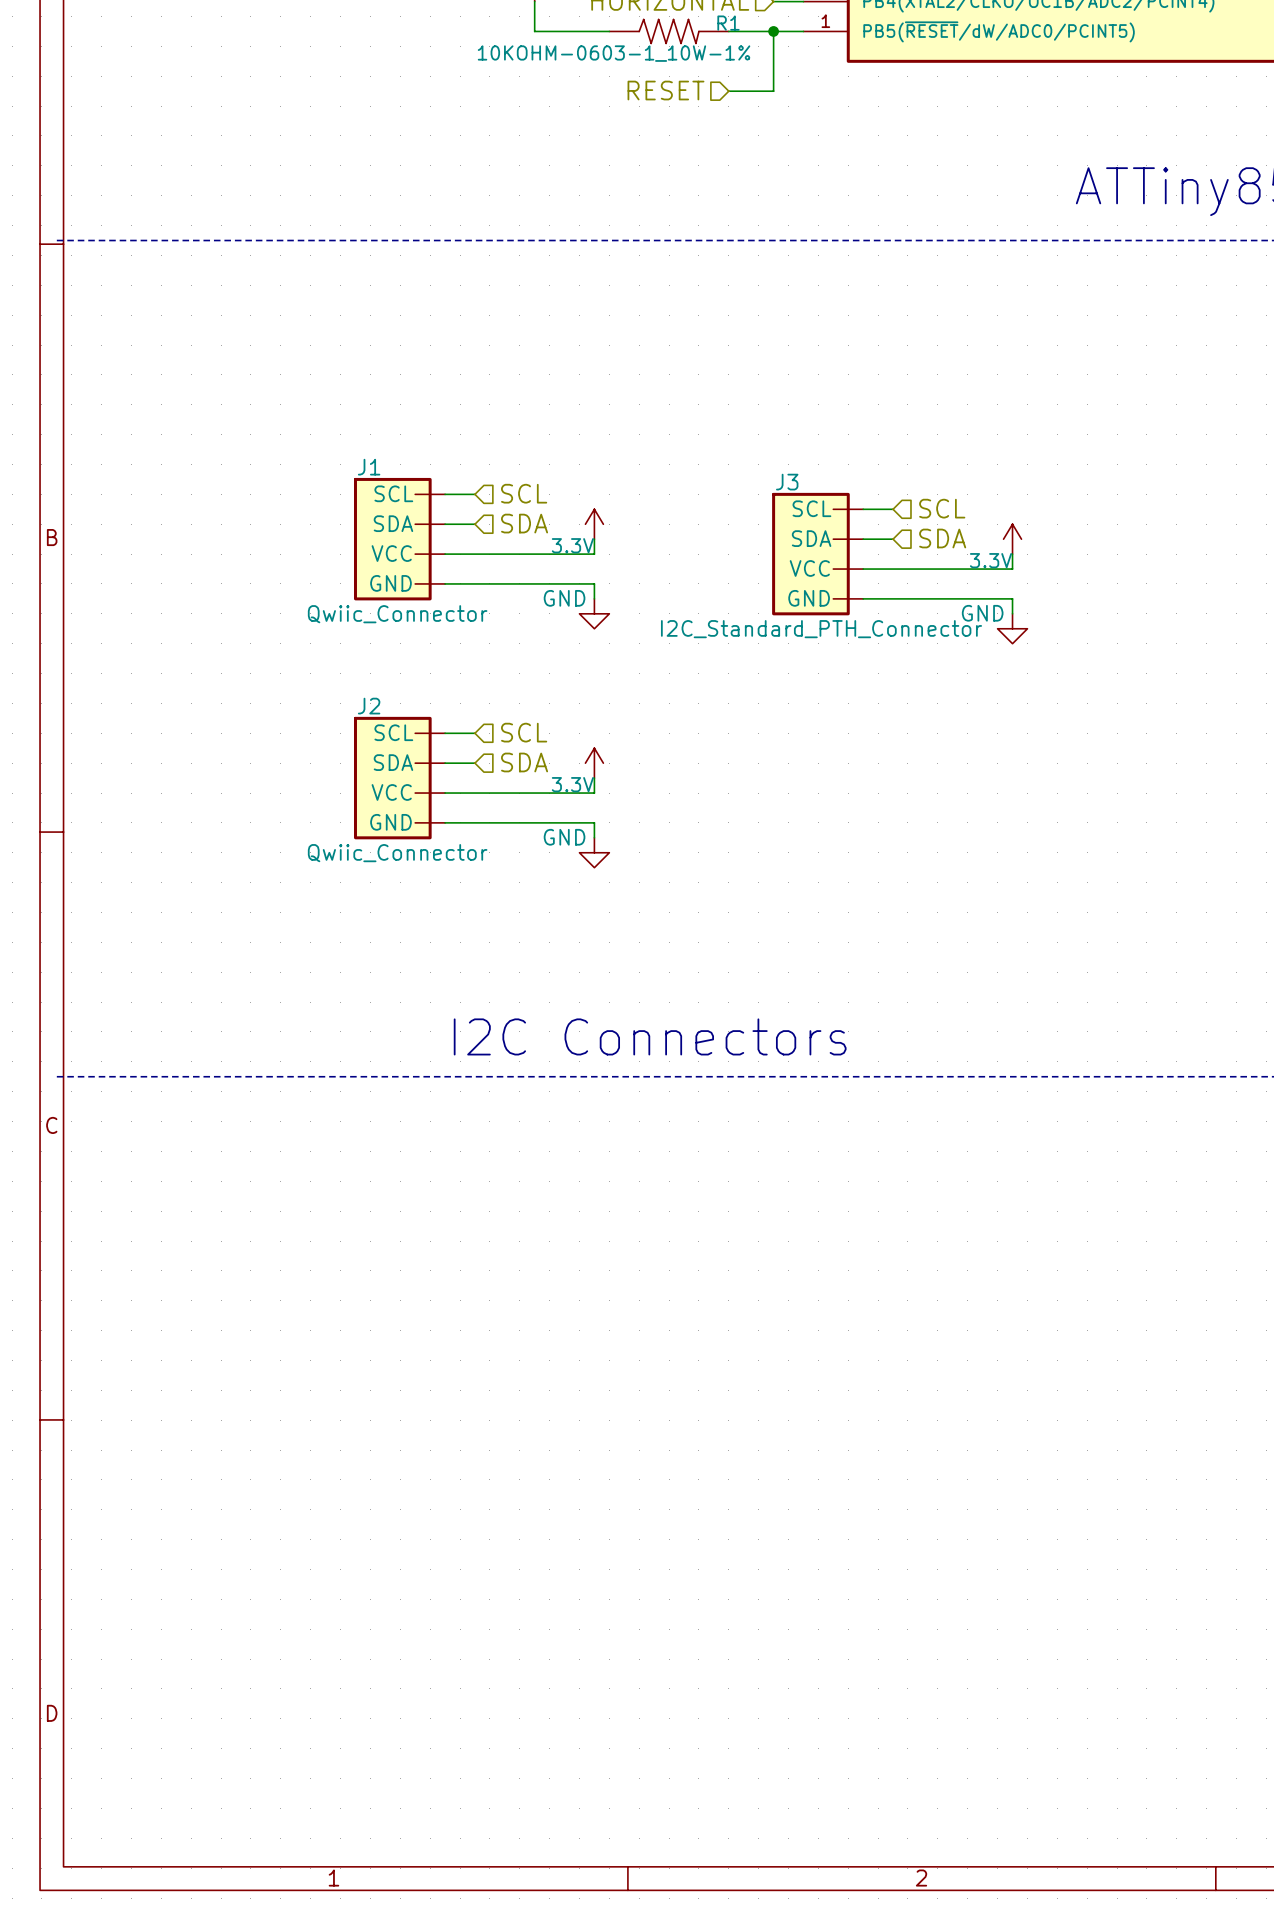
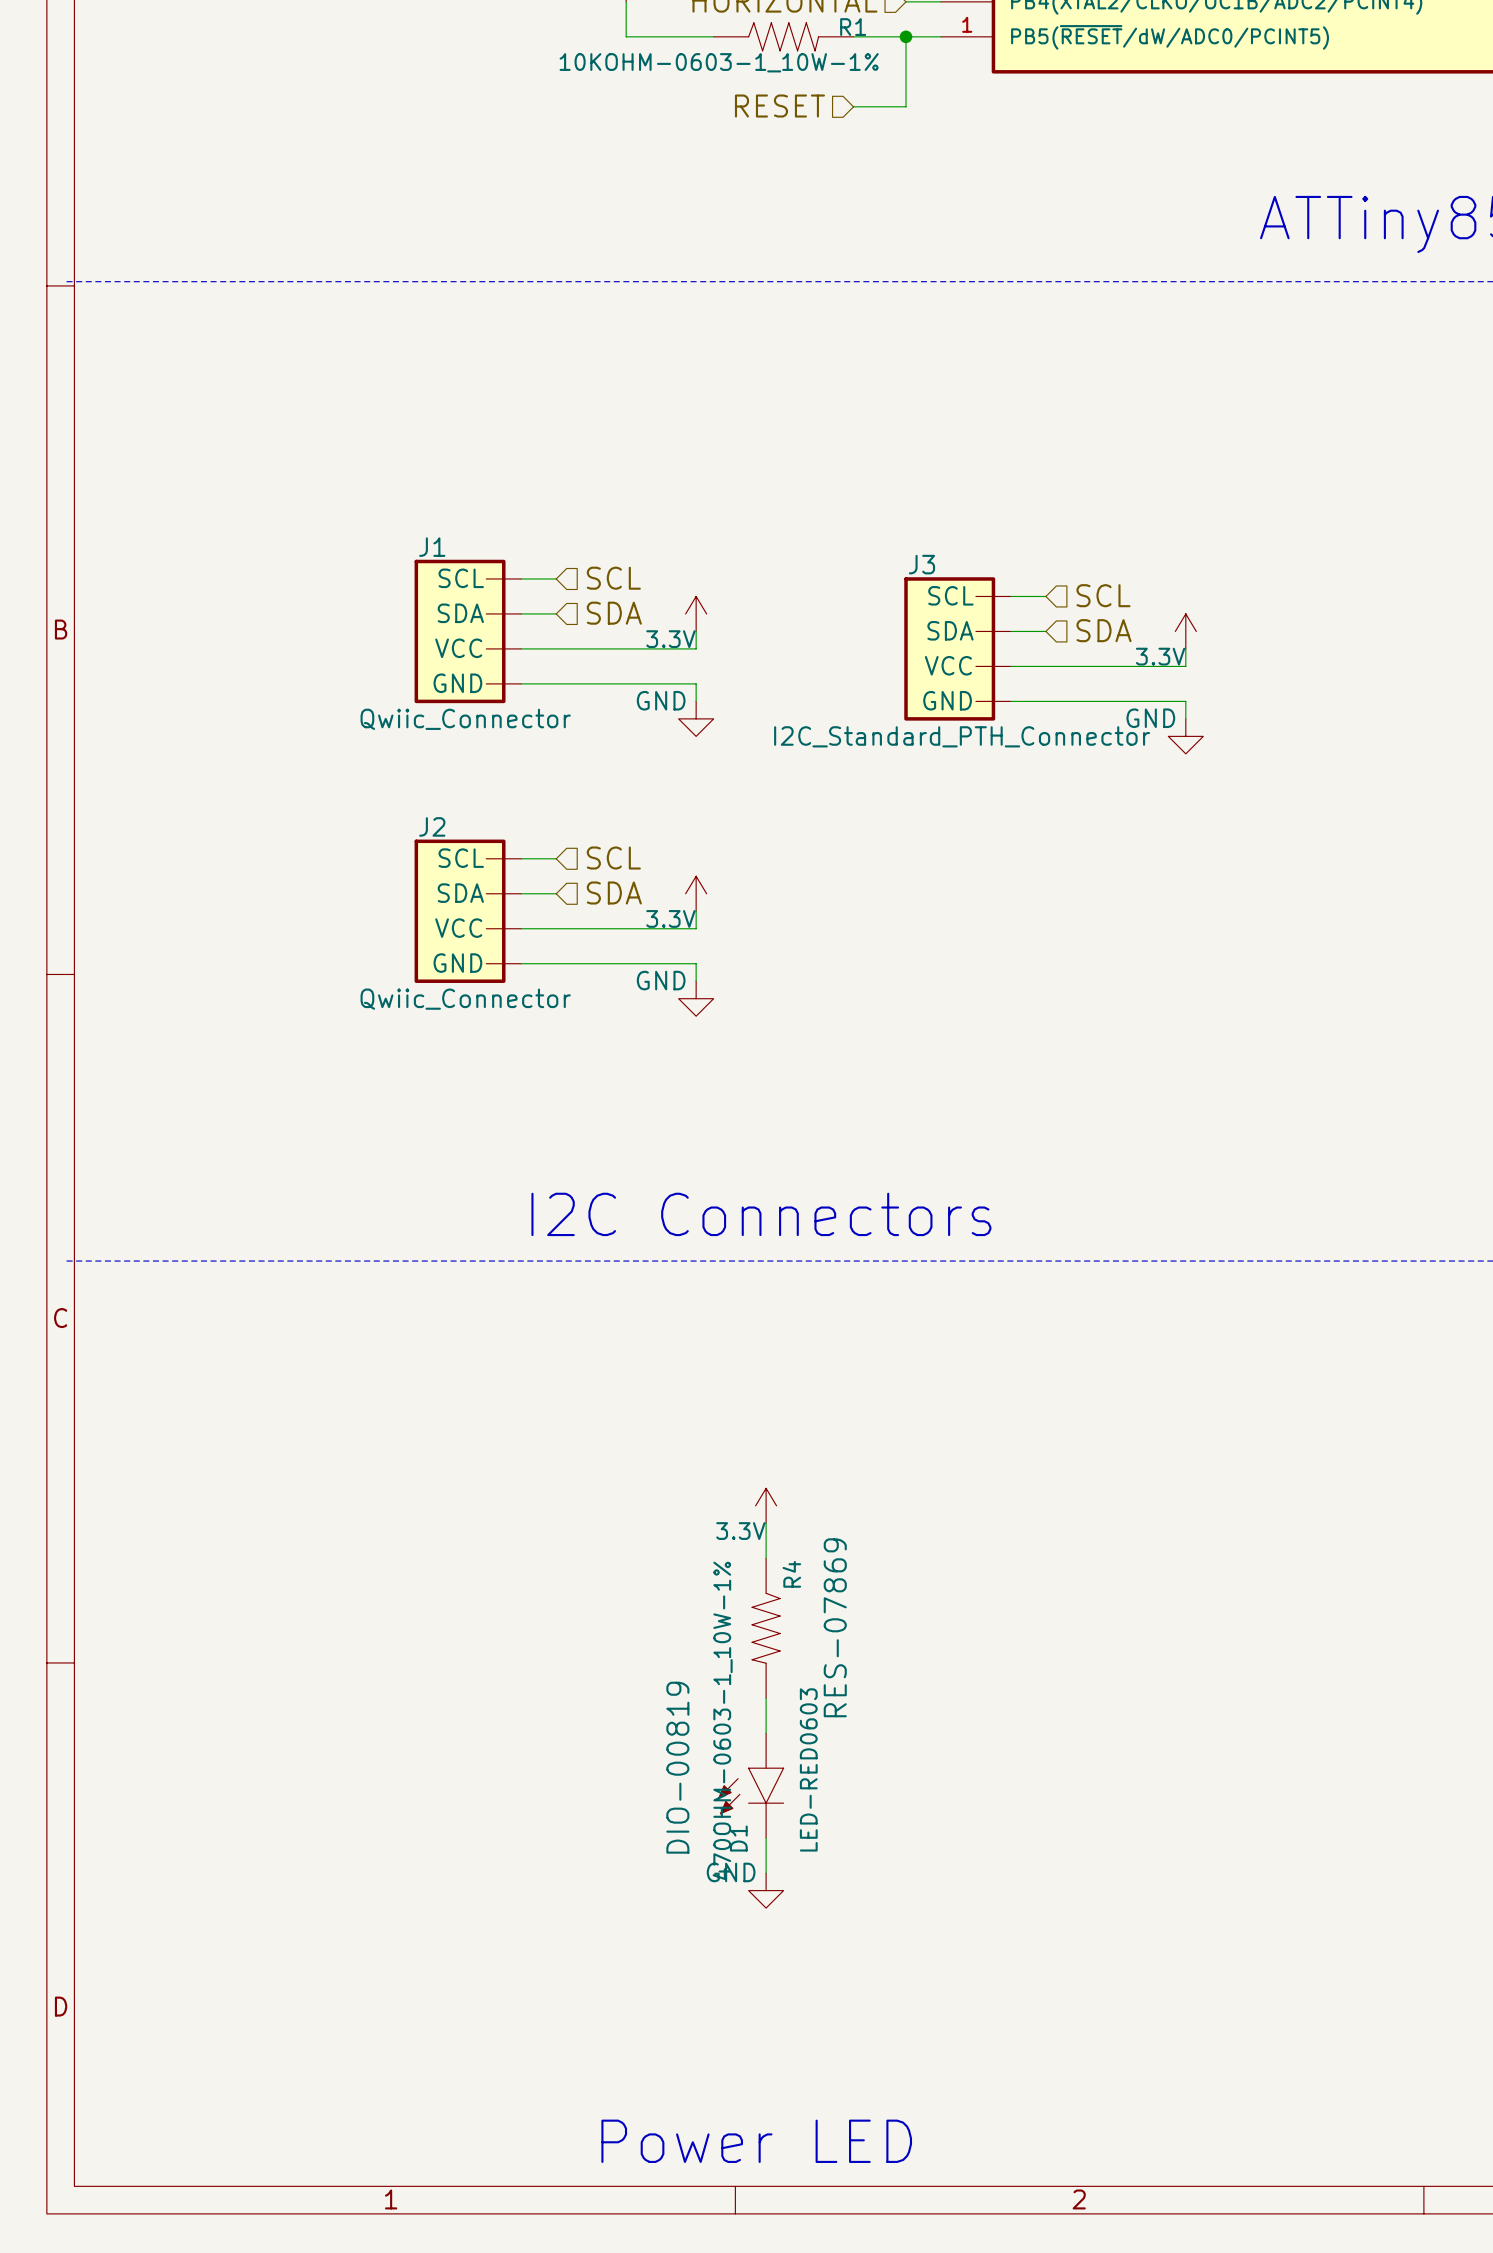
power symbol: none -> 3.3V (766, 1505)
wire: none -> (766, 1523) (766, 1558)
R4: none -> 470OHM-0603-1_10W-1% (766, 1628)
wire: none -> (766, 1698) (766, 1733)
D1: none -> LED-RED0603 (751, 1785)
wire: none -> (766, 1838) (766, 1873)
power symbol: none -> GND (766, 1890)
text: none -> Power LED (756, 2141)

